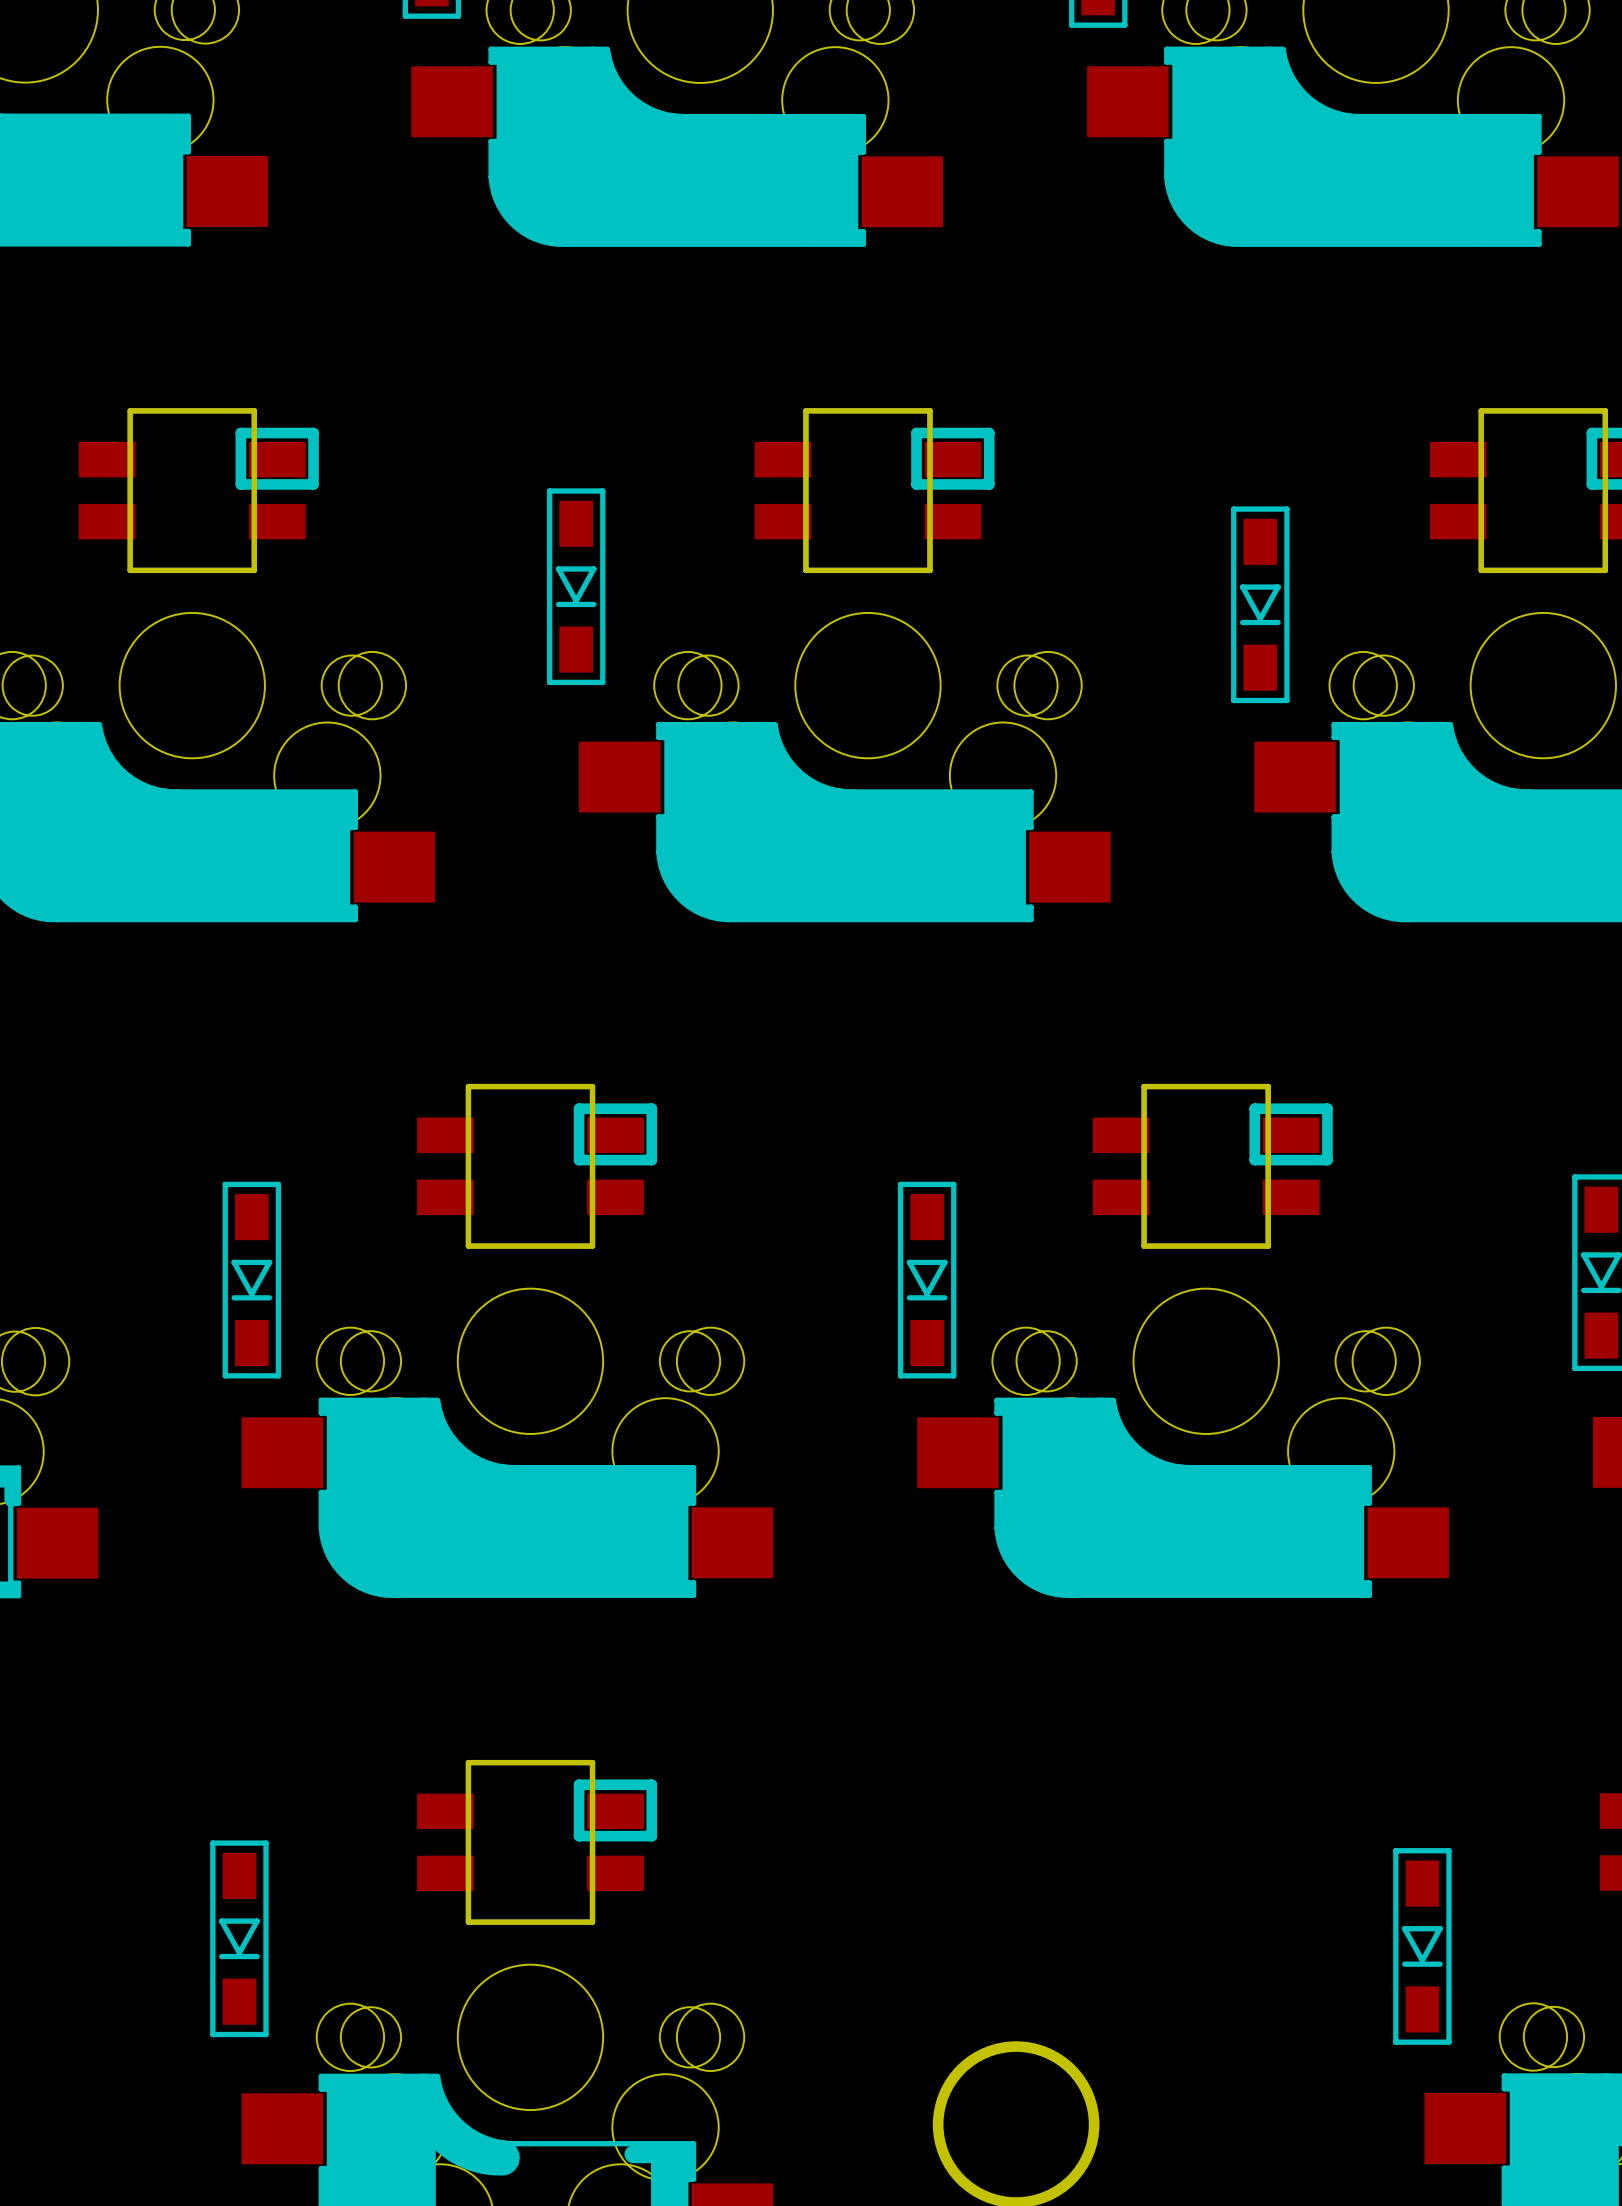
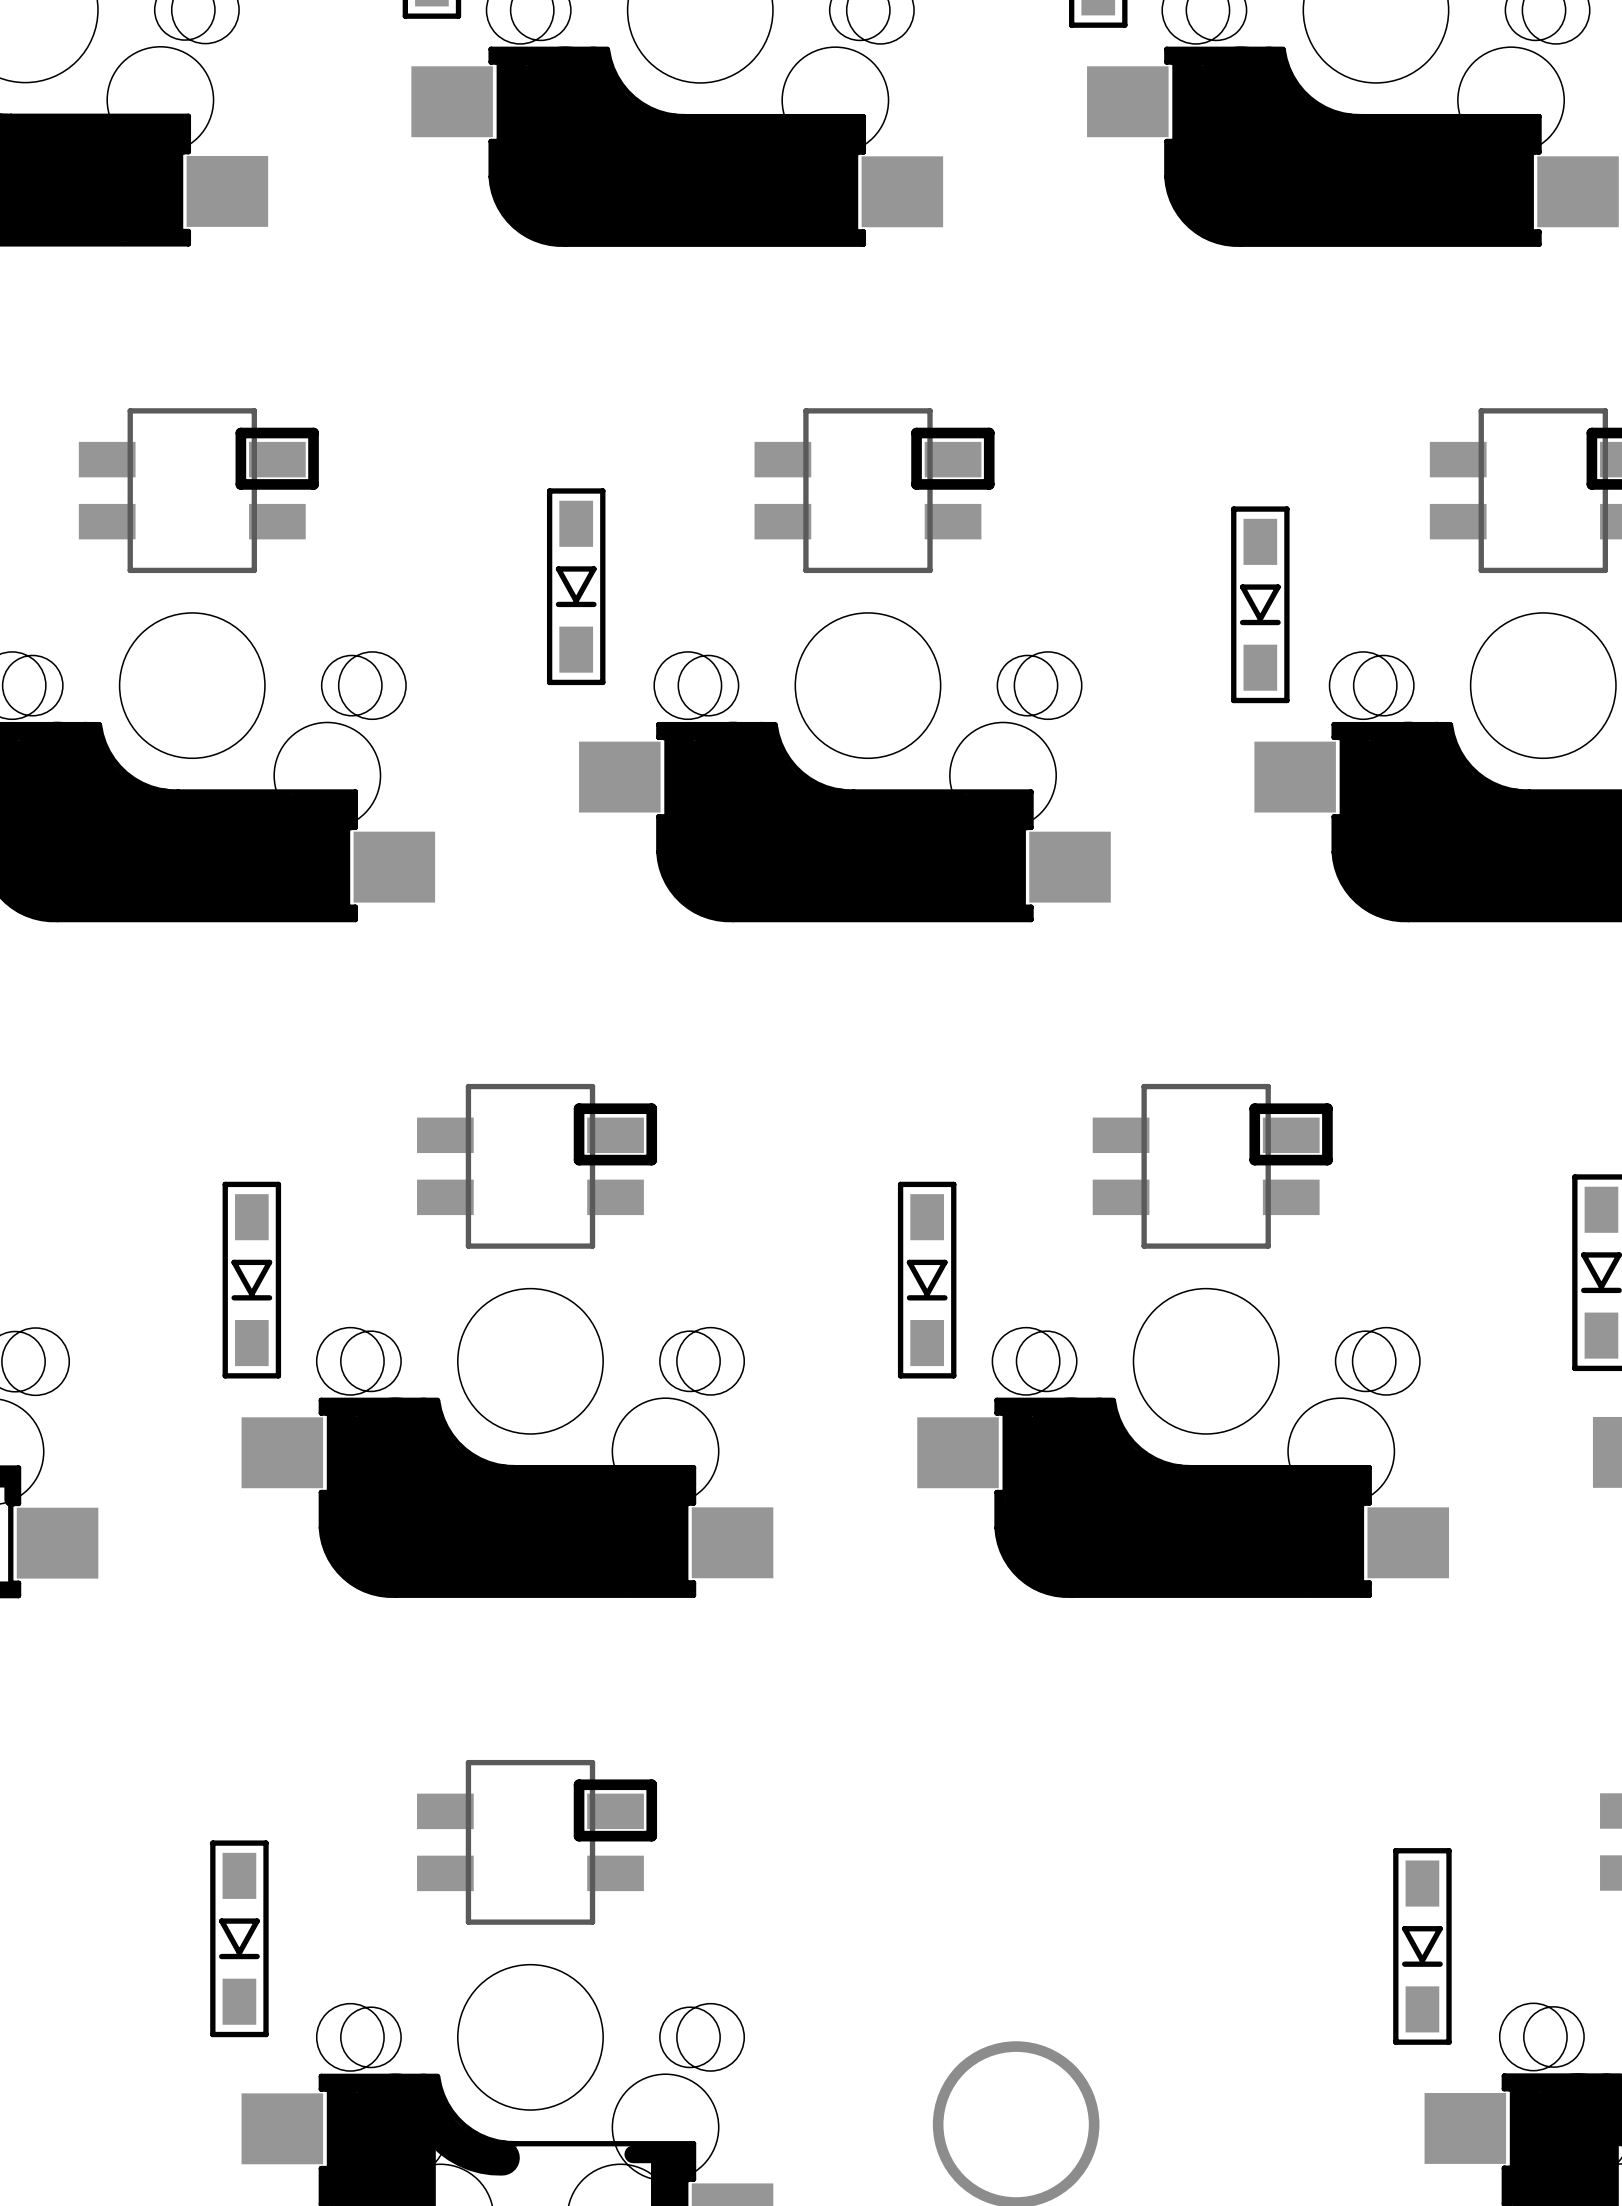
board edge: (130, 410) (254, 410) (254, 570) (130, 570) (130, 410) -> none
board edge: (805, 410) (805, 570) (930, 570) (930, 410) (805, 410) -> none
board edge: (1481, 410) (1605, 410) (1605, 570) (1481, 570) (1481, 410) -> none
board edge: (468, 1086) (592, 1086) (592, 1246) (468, 1246) (468, 1086) -> none
board edge: (1144, 1086) (1268, 1086) (1268, 1246) (1144, 1246) (1144, 1086) -> none
board edge: (468, 1762) (592, 1762) (592, 1922) (468, 1922) (468, 1762) -> none

